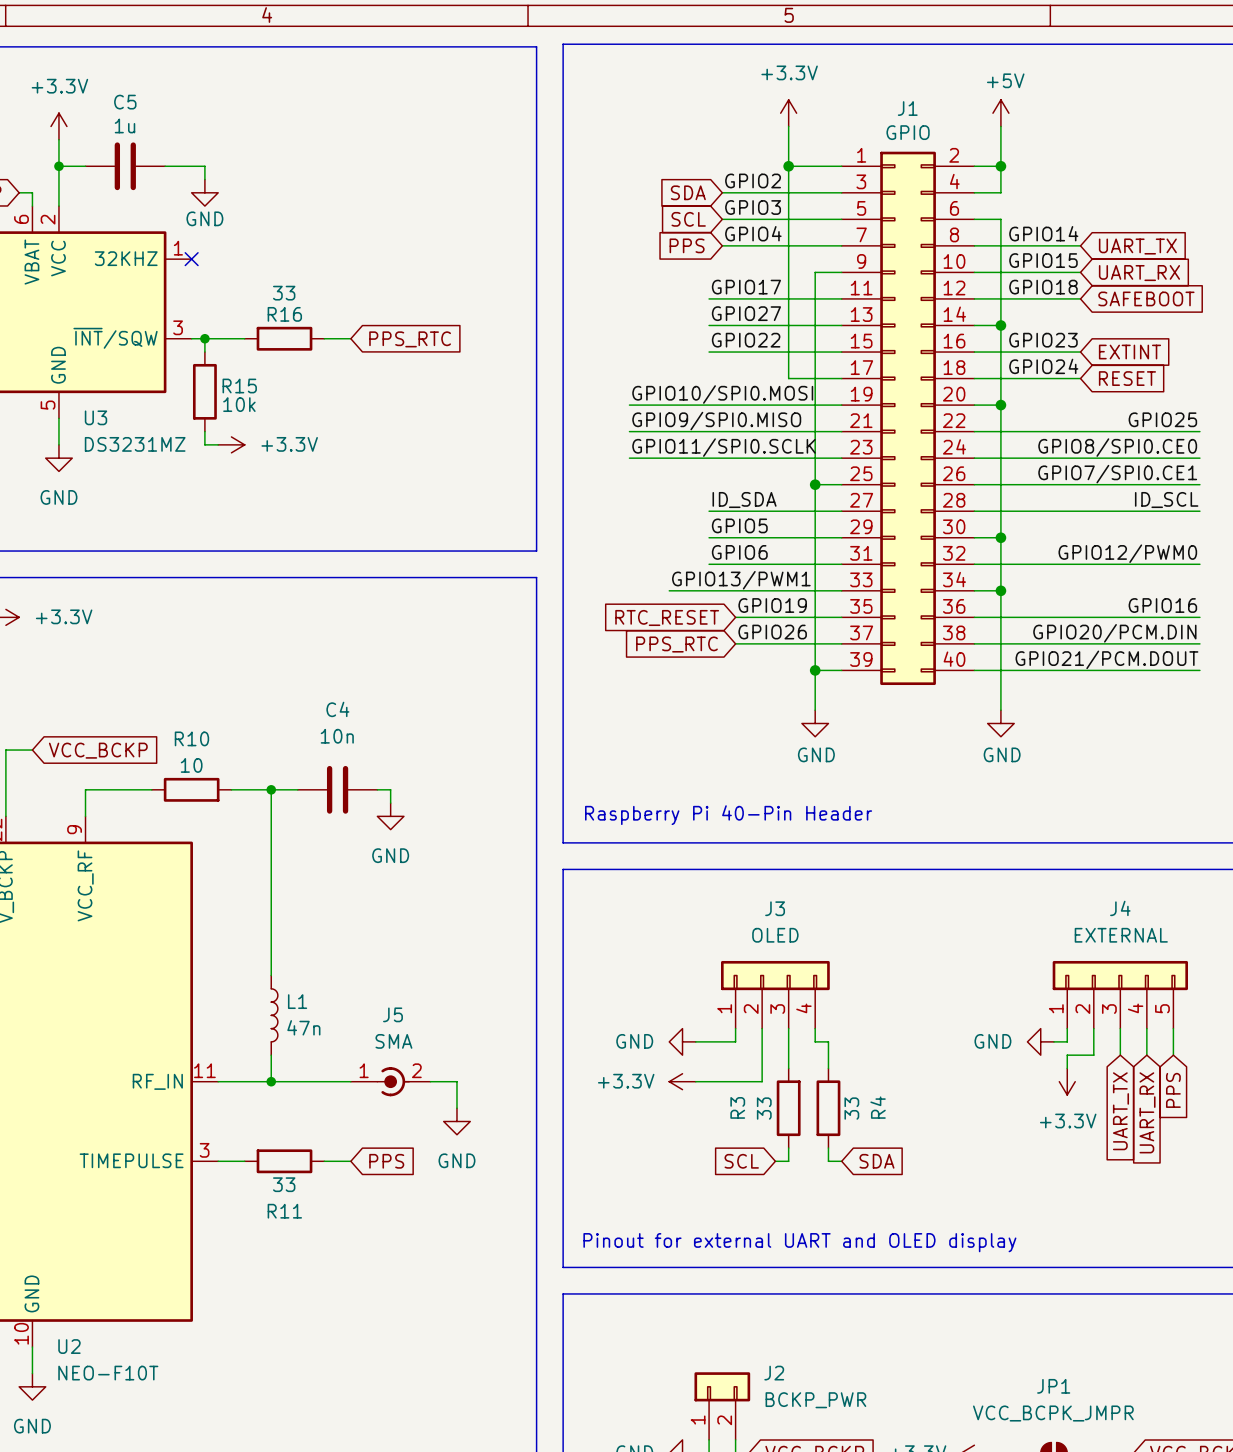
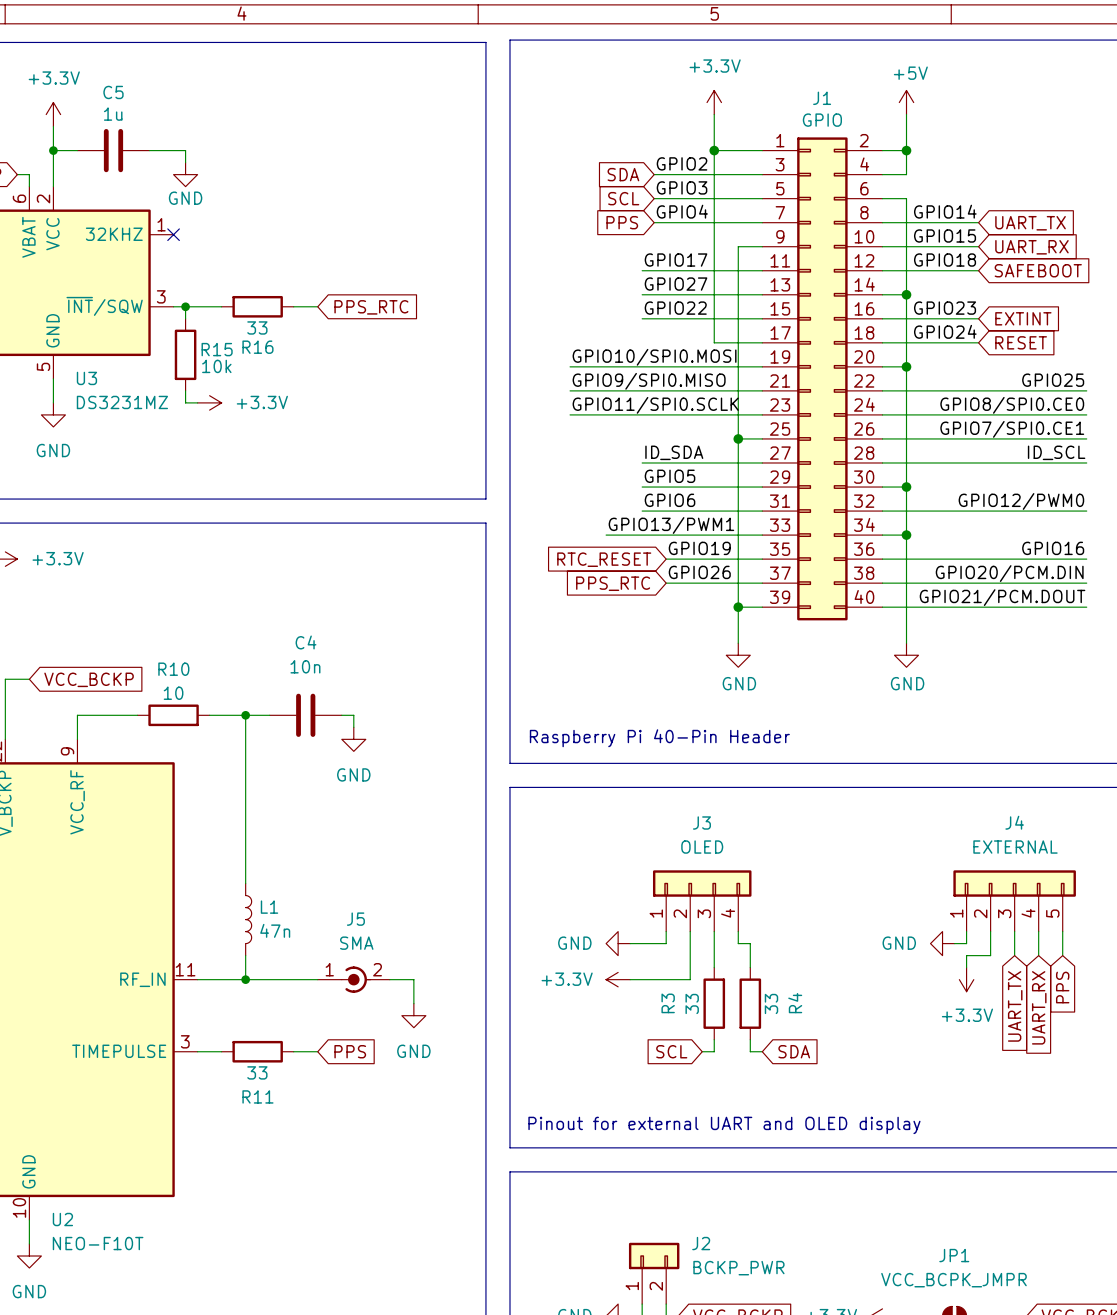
R16 value position: 33 (284, 293) -> 33 (257, 327)
R16 name position: R16 (284, 314) -> R16 (257, 347)

